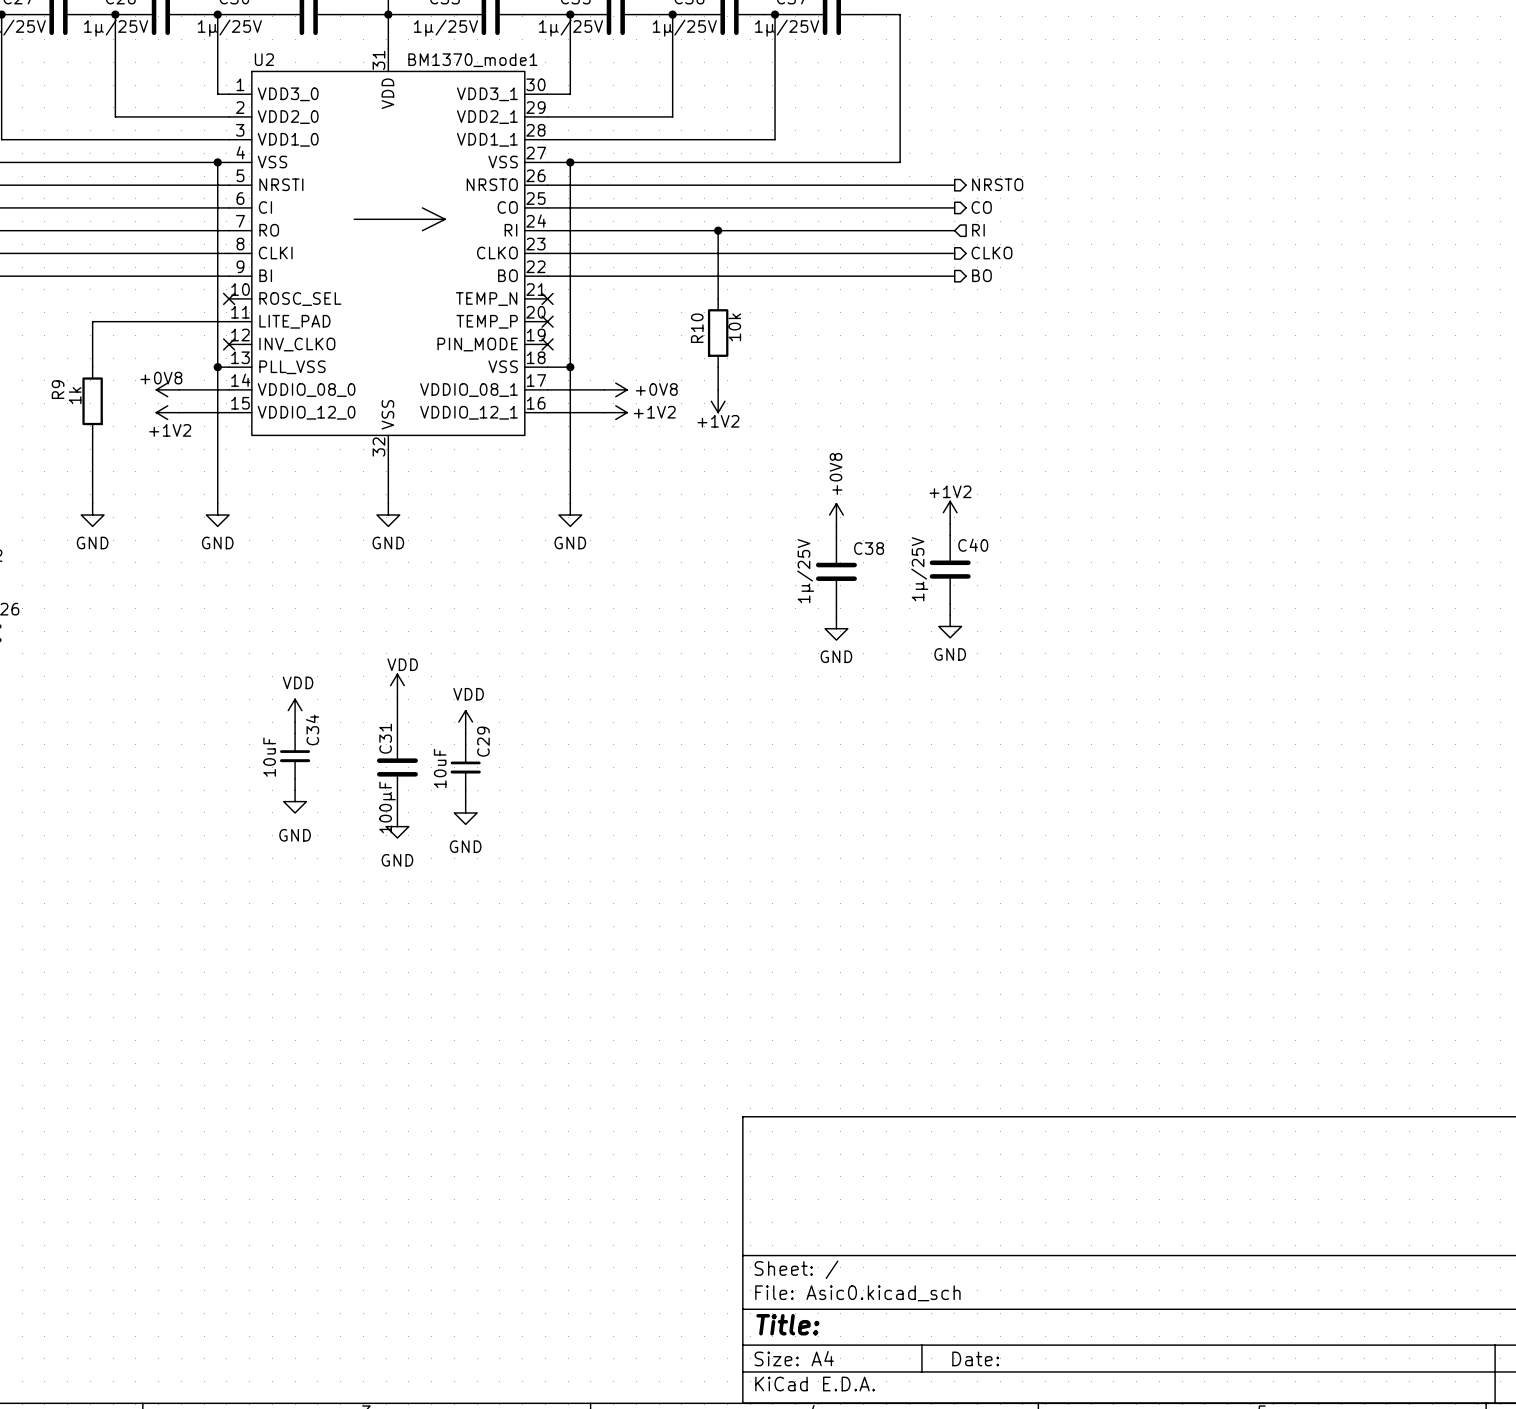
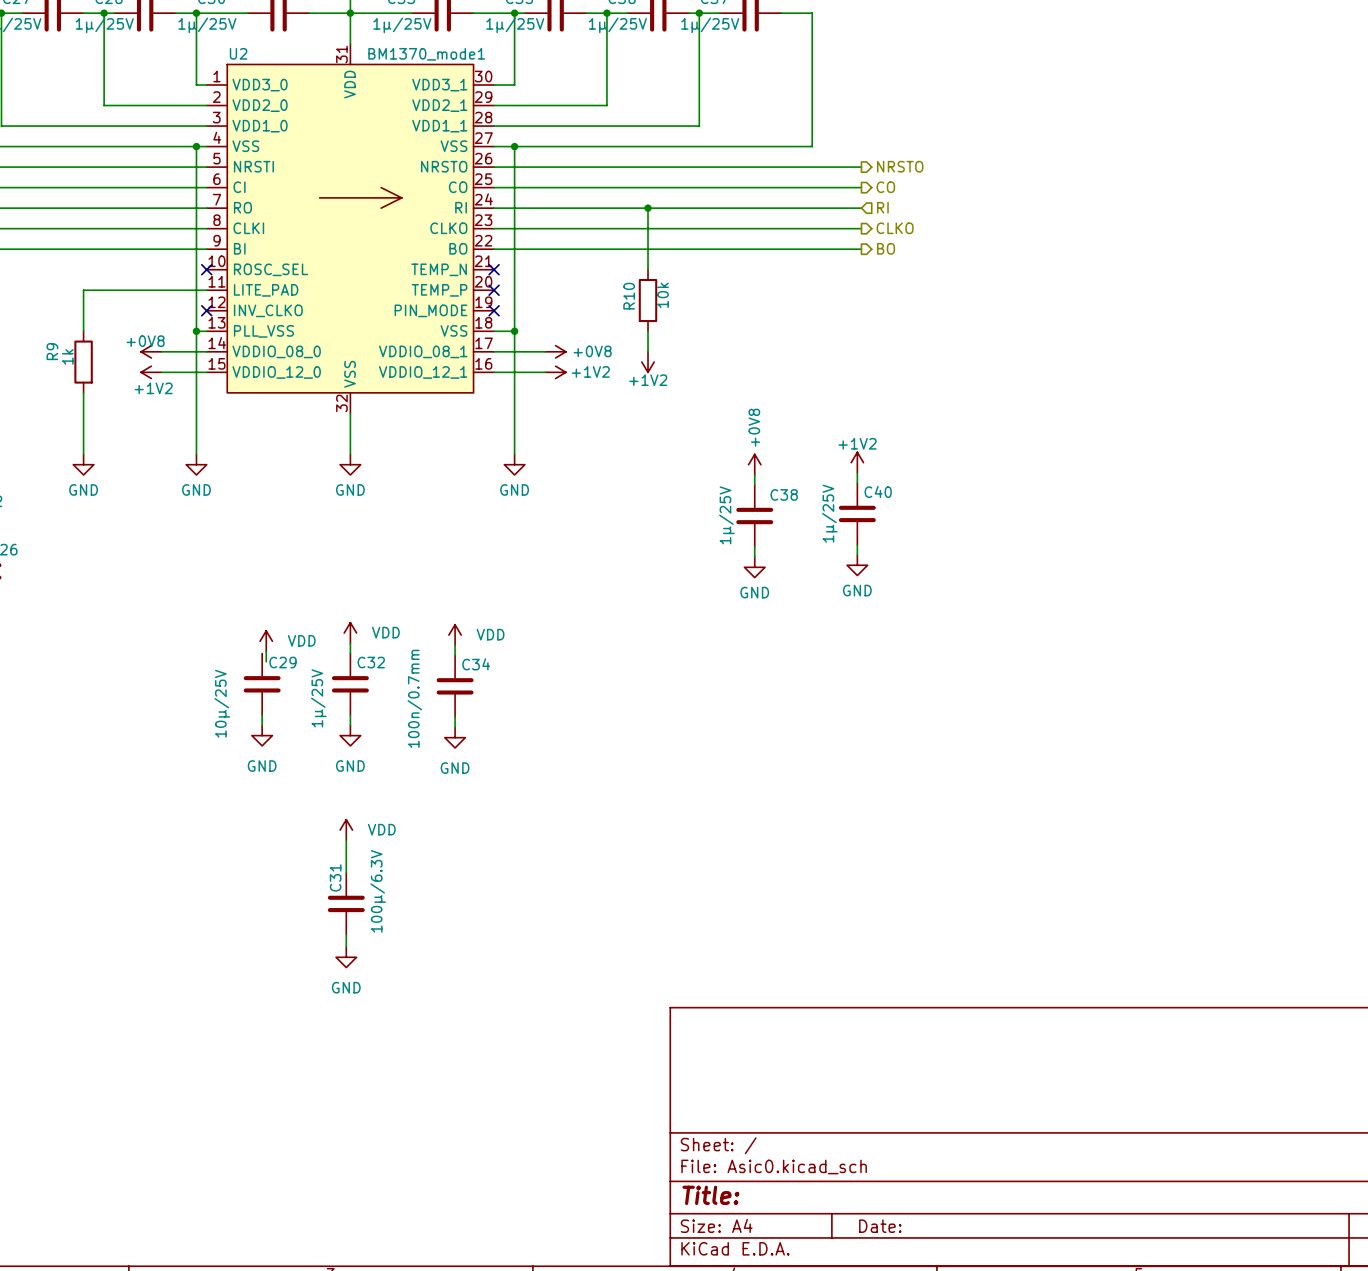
power symbol text position: VDD (402, 664) -> VDD (385, 632)
power symbol text position: VDD (298, 682) -> VDD (301, 640)
power symbol position: VDD (397, 685) -> VDD (350, 633)
wire: (397, 696) (397, 733) -> none
power symbol: none -> VDD (455, 635)
wire: none -> (350, 643) (350, 653)
power symbol: VDD (465, 722) -> none
C34 symbol: [279, 733, 311, 779] -> [436, 655, 474, 718]
wire: (465, 733) (465, 744) -> (455, 645) (455, 655)
C29 symbol: [450, 744, 481, 791] -> [243, 653, 281, 716]
C34 value: 10uF (269, 757) -> 100n/0.7mm (414, 698)
C32: none -> 1µ/25V (350, 684)
C31 position: (397, 767) -> (346, 903)
C29 value: 10uF (440, 768) -> 10µ/25V (222, 703)
wire: (295, 778) (295, 790) -> (262, 715) (262, 725)
wire: (465, 790) (465, 801) -> (455, 717) (455, 727)
wire: none -> (350, 715) (350, 725)
power symbol position: GND (295, 801) -> GND (262, 735)
wire: (397, 801) (397, 815) -> none
C31 value: 100µF (387, 807) -> 100µ/6.3V (378, 891)
power symbol: GND (465, 812) -> none
power symbol: none -> GND (455, 737)
power symbol position: GND (397, 826) -> GND (350, 735)
power symbol: none -> VDD (346, 830)
wire: none -> (346, 840) (346, 873)
wire: none -> (346, 934) (346, 947)
power symbol: none -> GND (346, 957)

